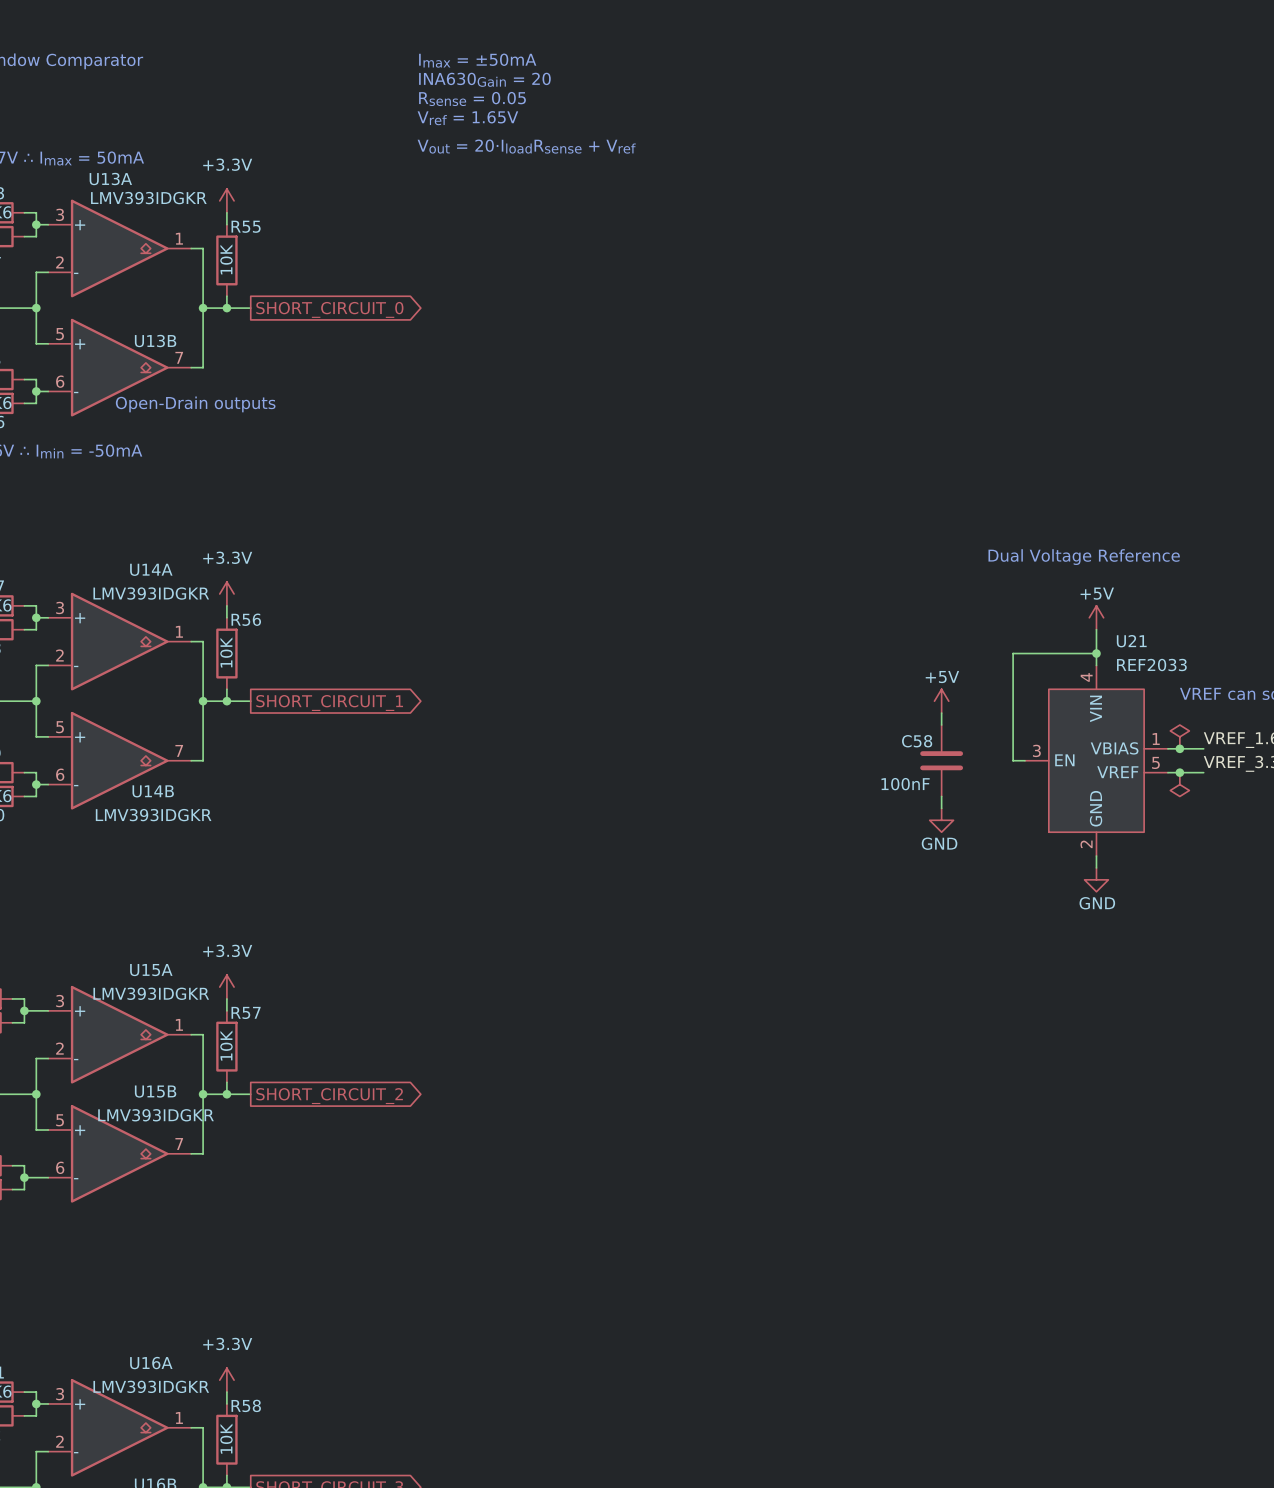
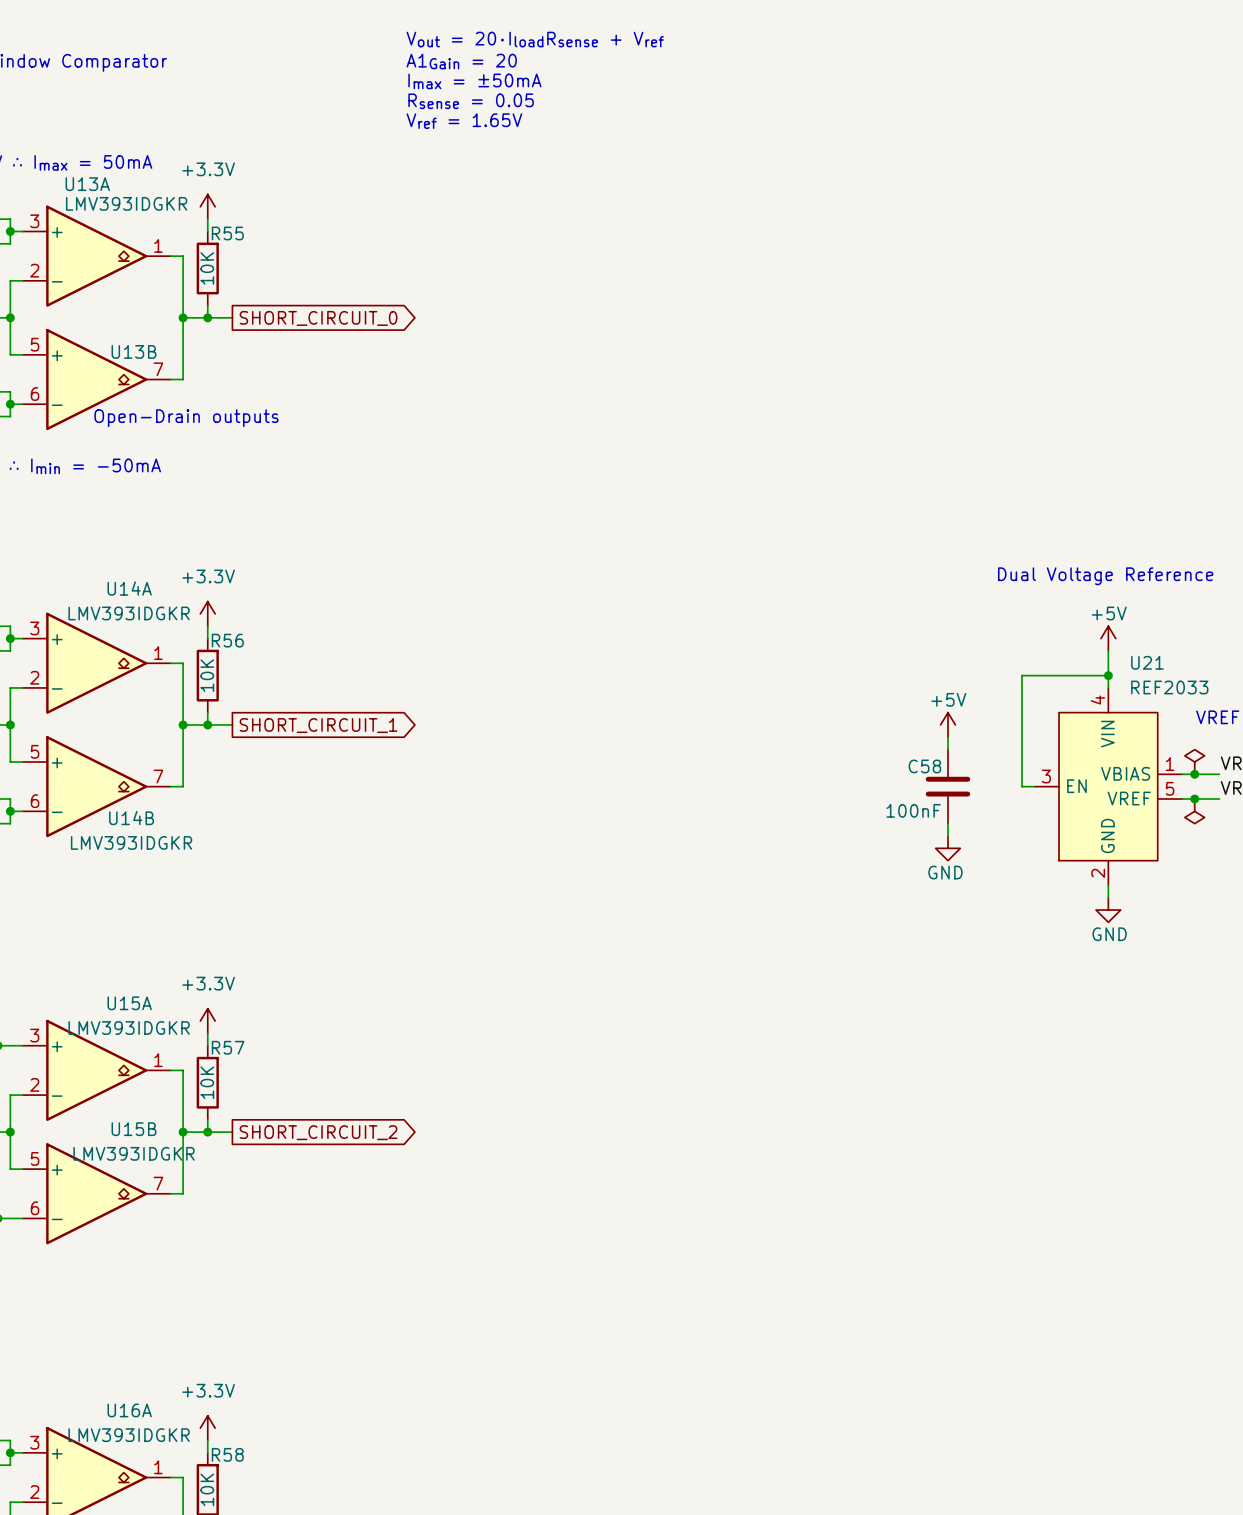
text: Imax = ±50mA (477, 60) -> A1Gain = 20 (461, 61)
text: INA630Gain = 20 (484, 79) -> Imax = ±50mA (474, 81)
text position: Vout = 20·IloadRsense + Vref (526, 146) -> Vout = 20·IloadRsense + Vref (535, 39)

